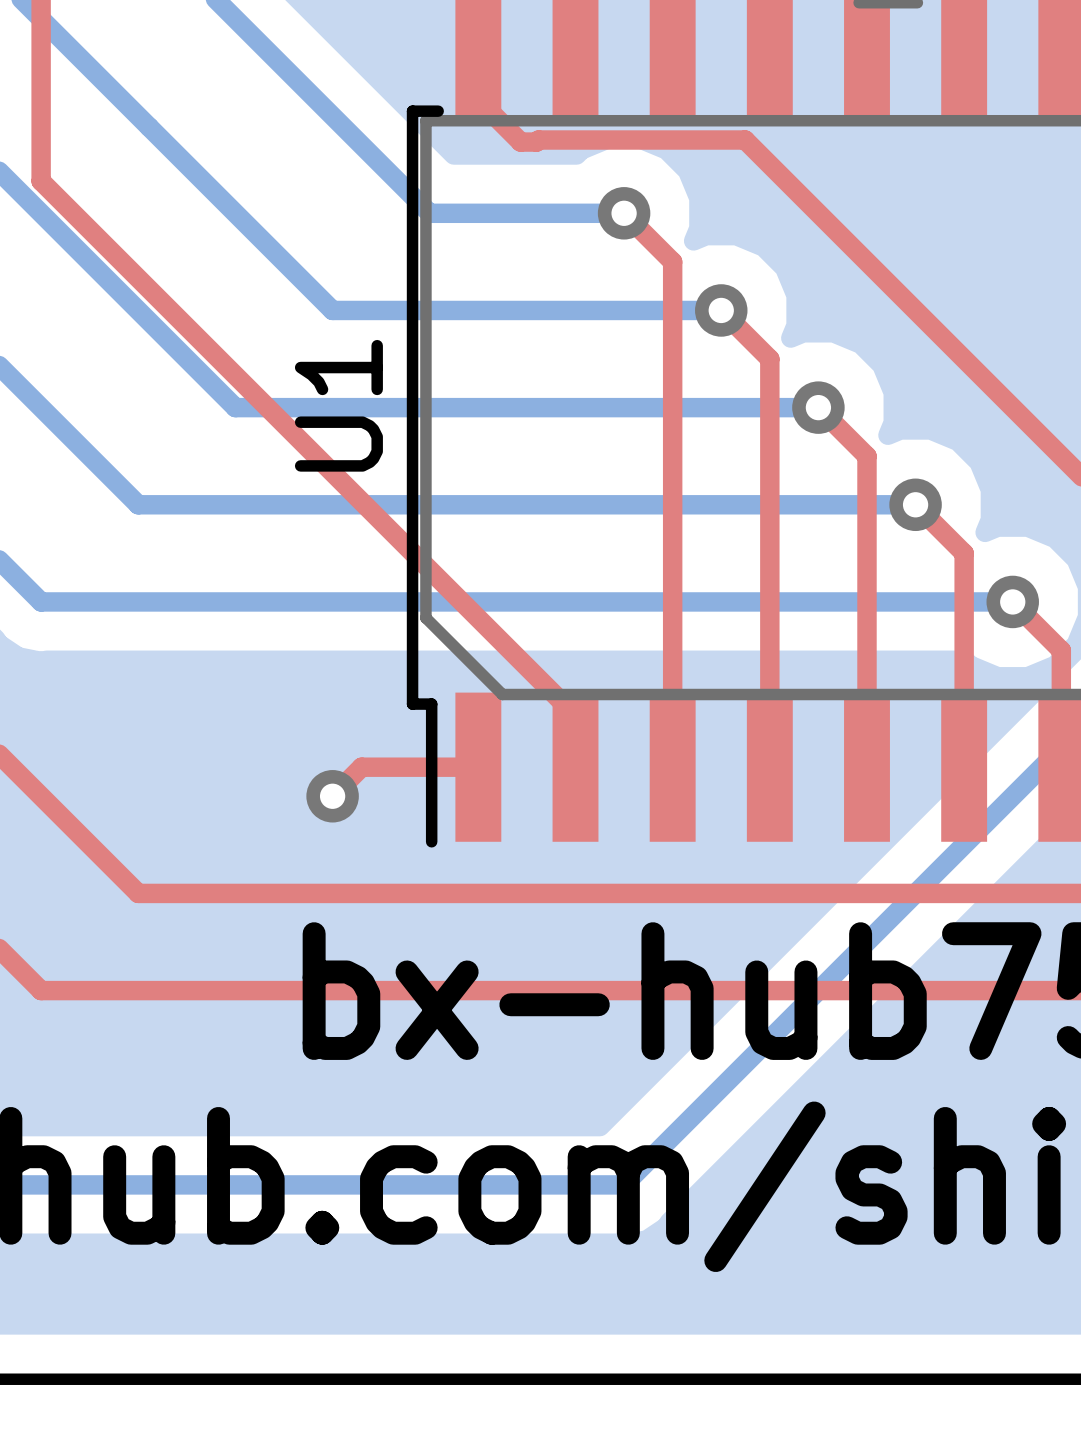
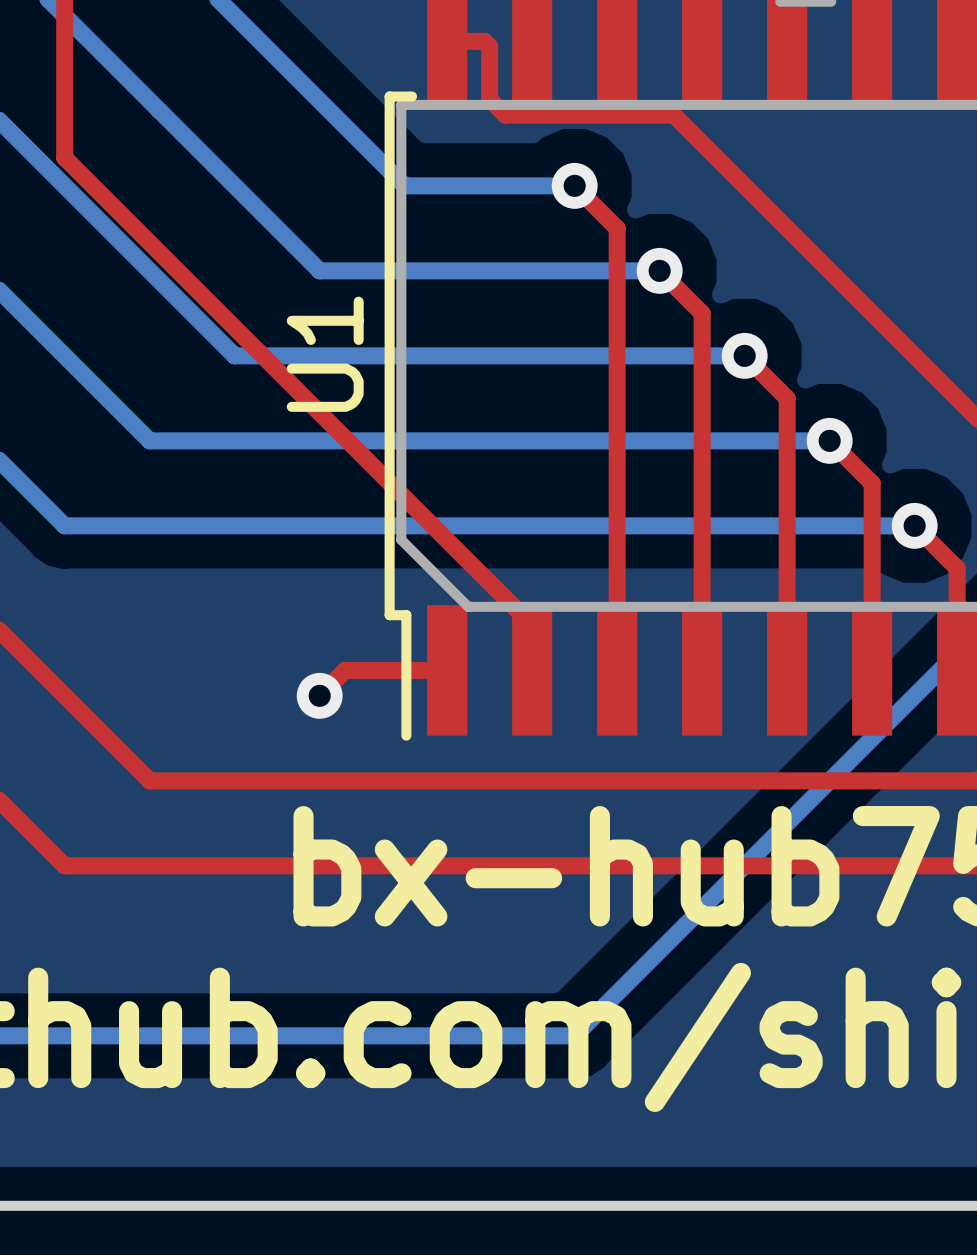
top track: (478, 48) (478, 99) (520, 142) (536, 142) (538, 140) (745, 140) -> (447, 41) (484, 41) (489, 46) (489, 99) (505, 115) (673, 115) (680, 121)

